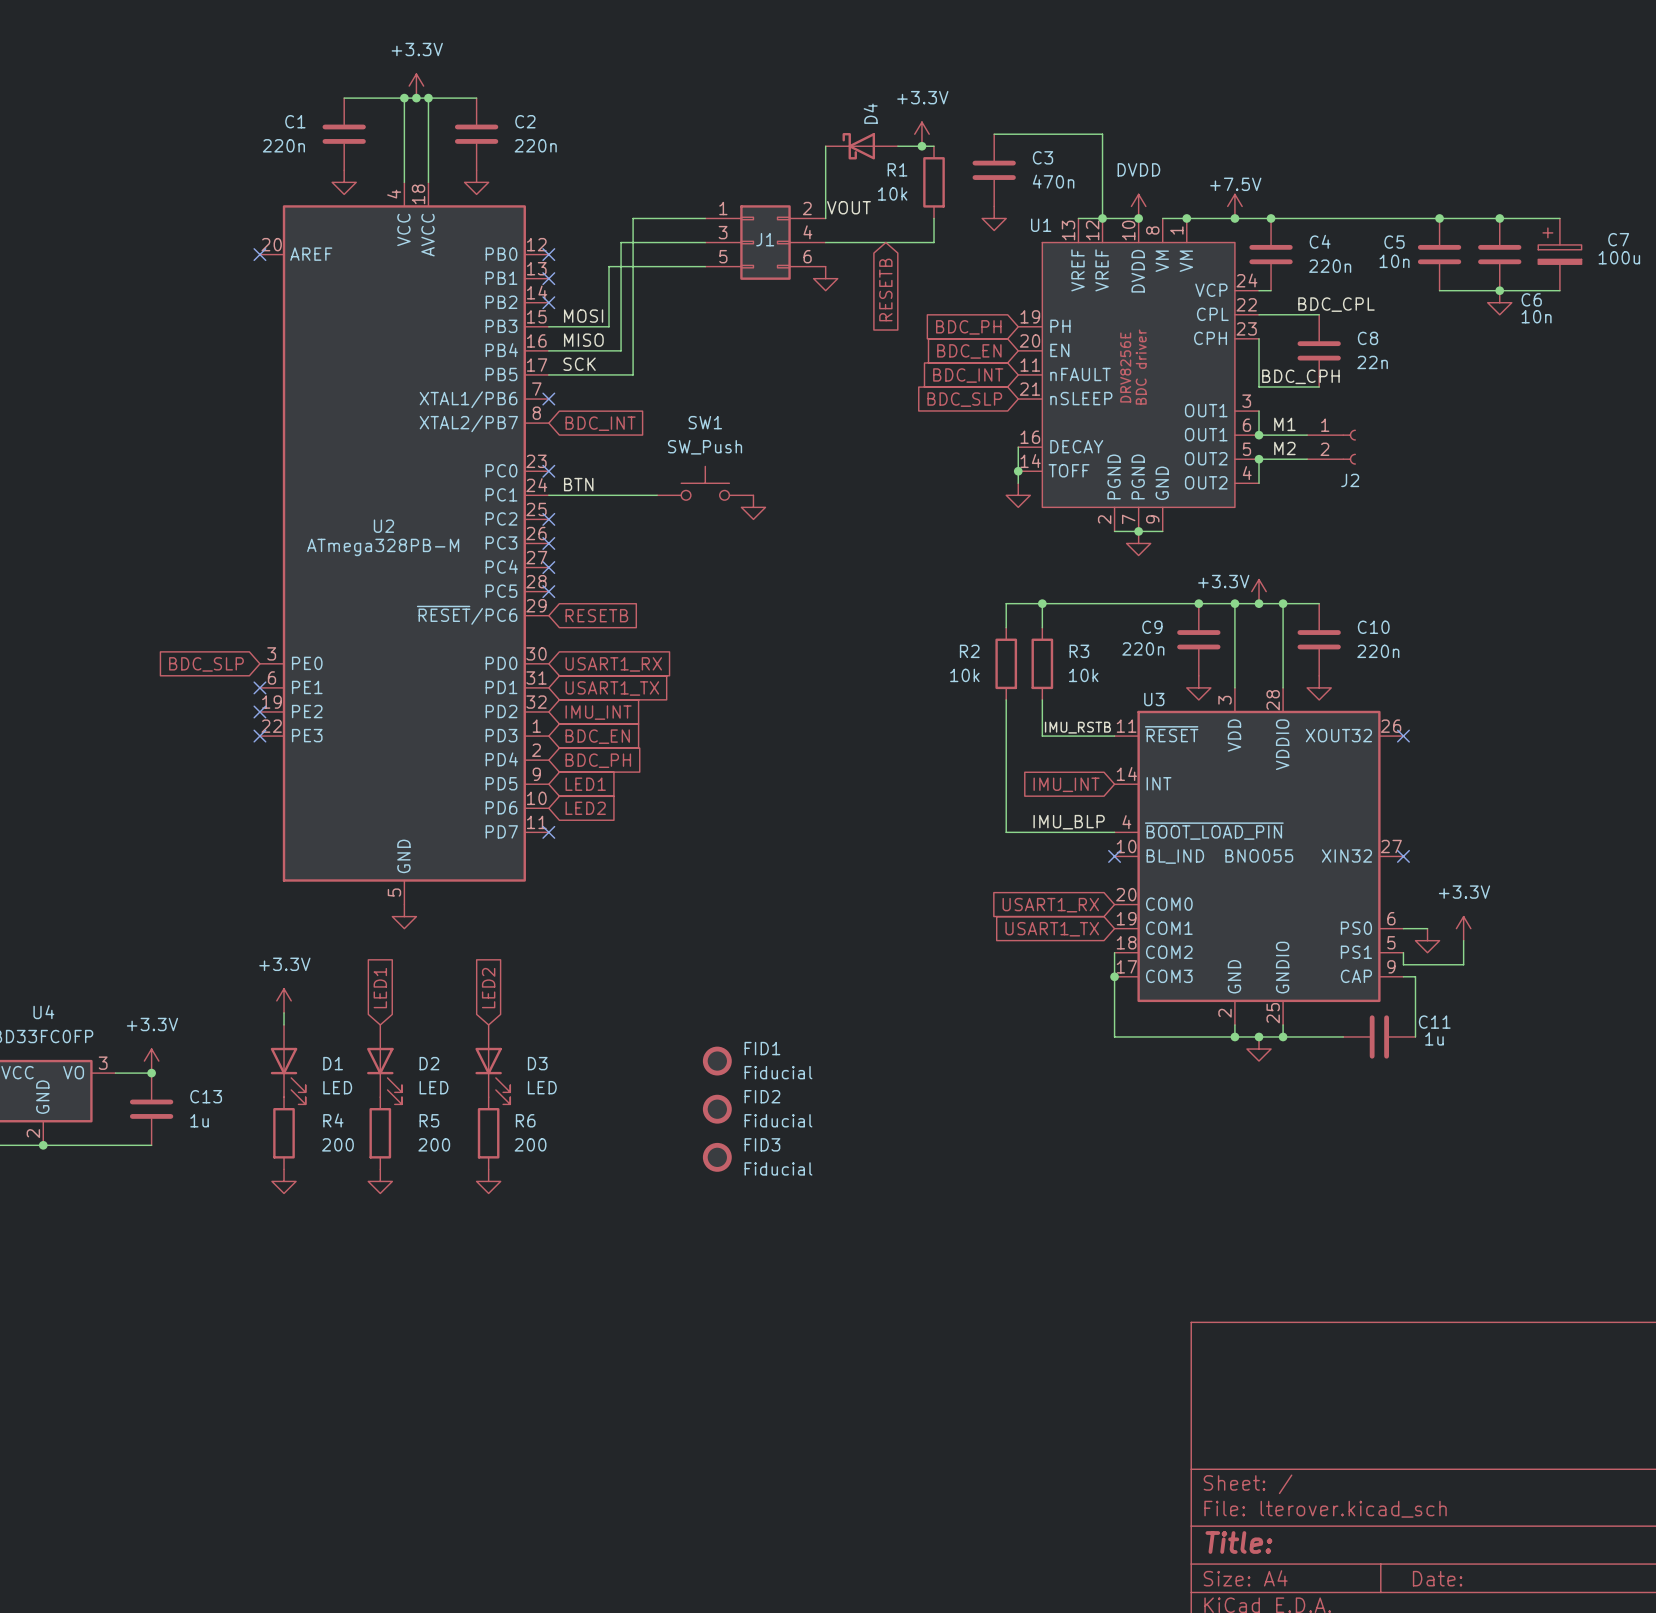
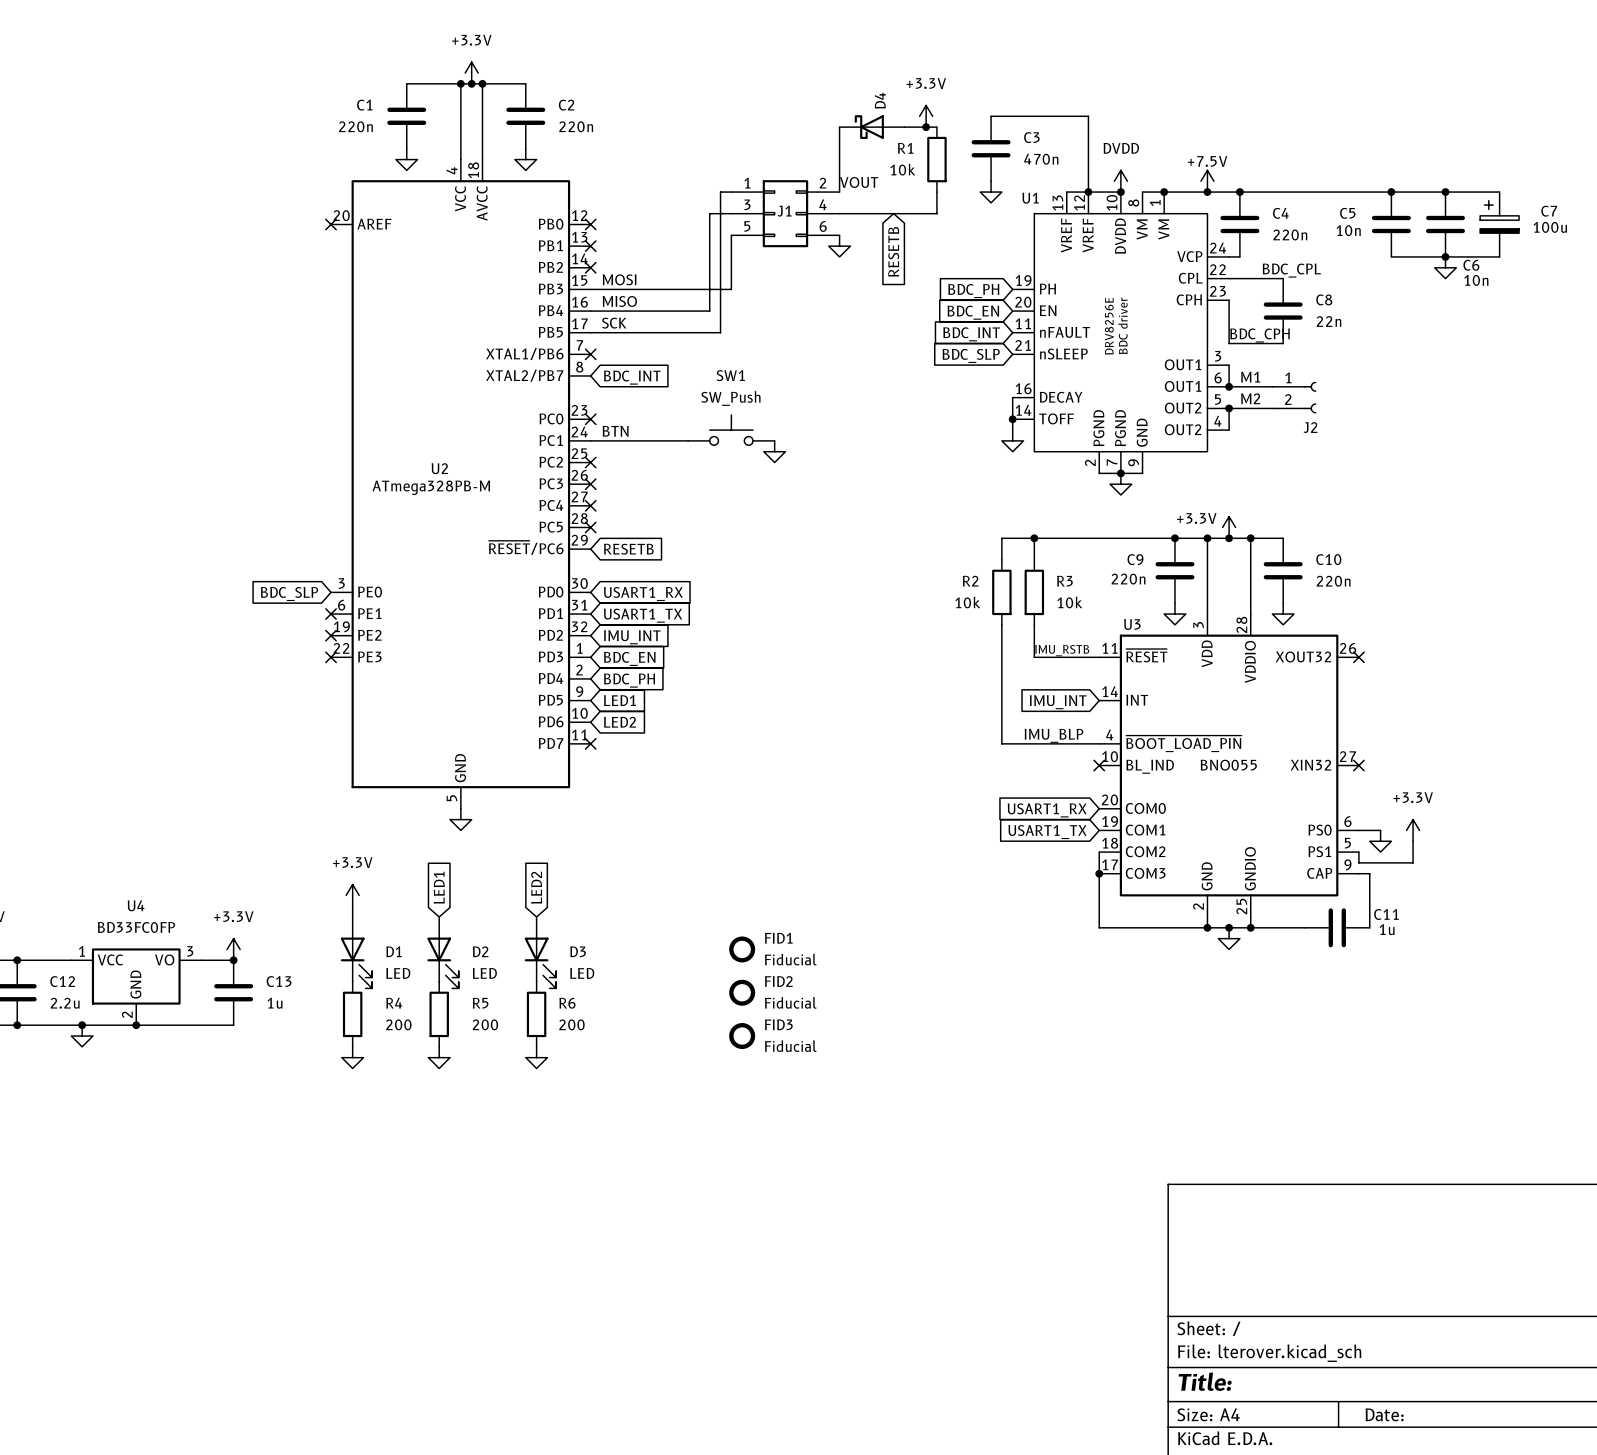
wire: (693, 218) (633, 218) (633, 374) -> (720, 192) (720, 332) (666, 332)
wire: (681, 242) (621, 242) (621, 350) -> (709, 213) (709, 311) (655, 311)
wire: (705, 266) (609, 266) (609, 326) -> (731, 235) (731, 289) (644, 289)

